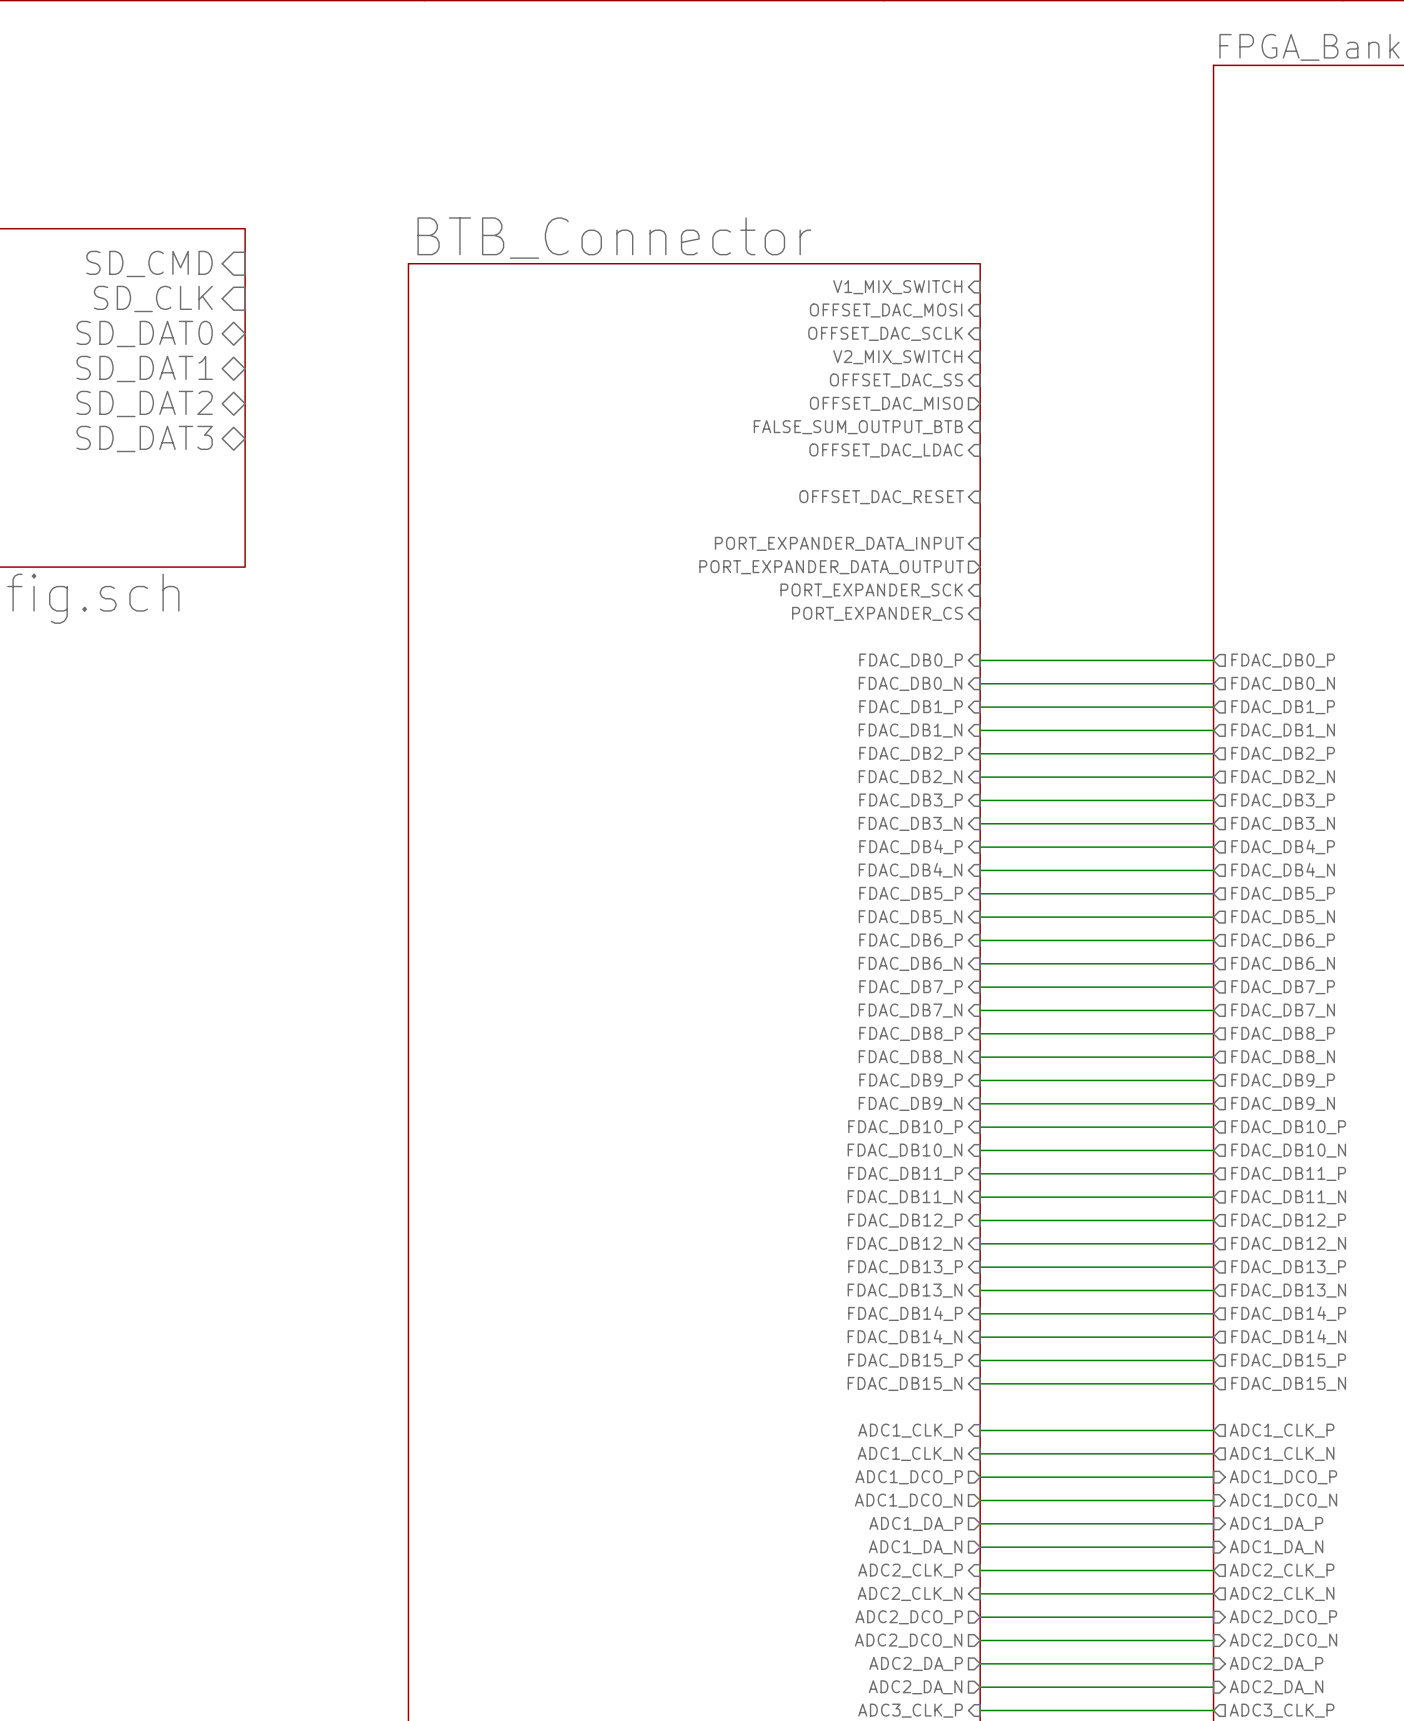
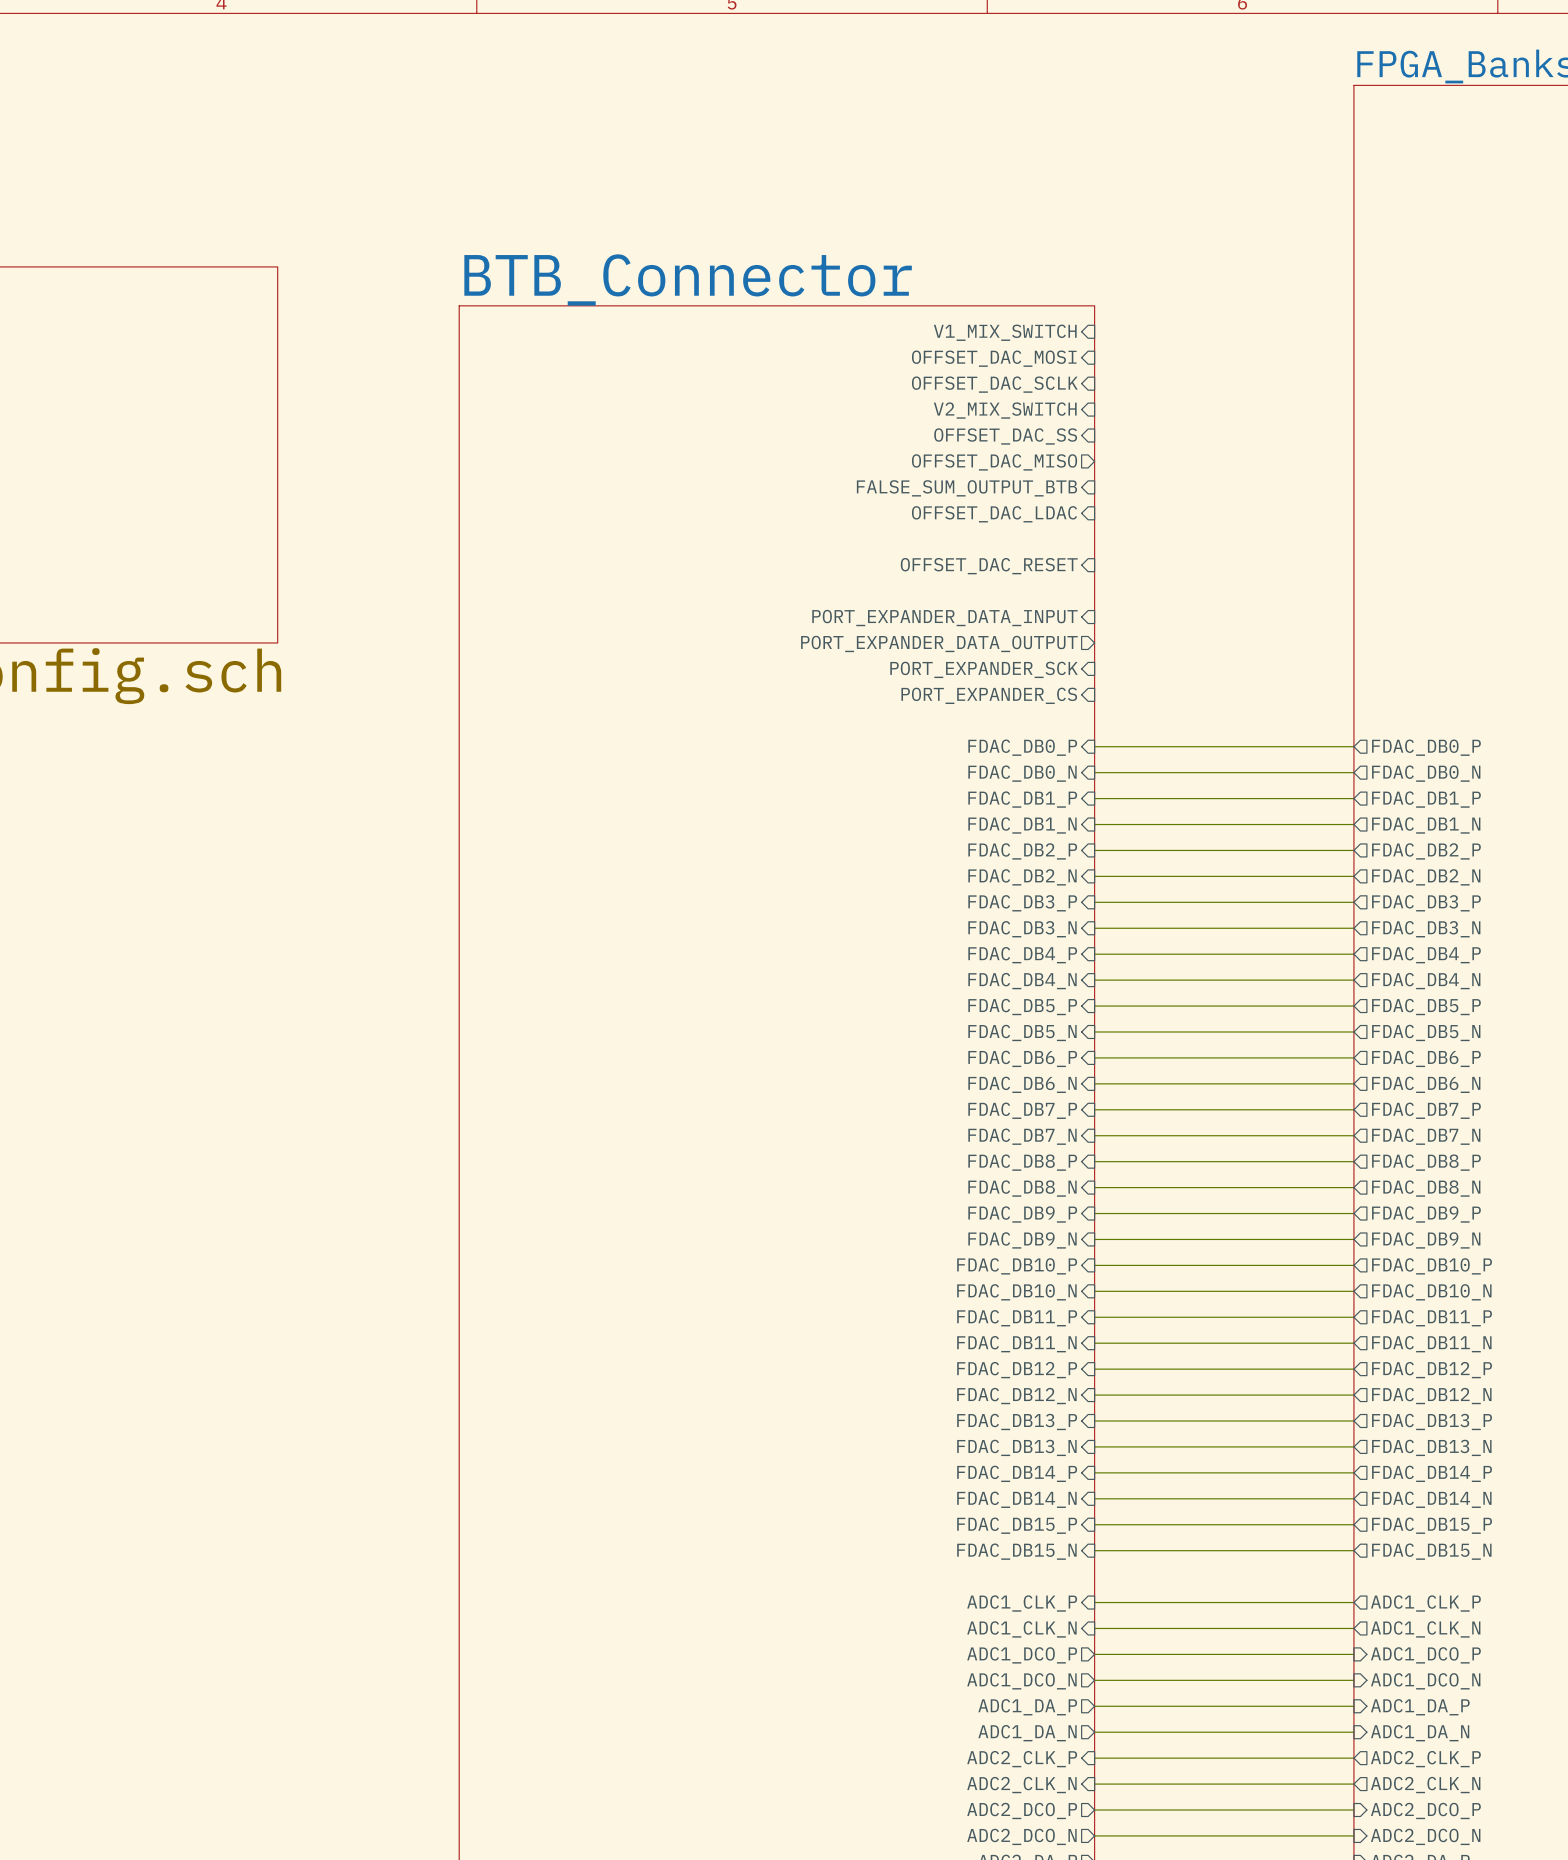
sheet pin: SD_CMD (149, 263) -> none
sheet pin: SD_CLK (153, 298) -> none
sheet pin: SD_DAT0 (144, 333) -> none
sheet pin: SD_DAT1 (144, 368) -> none
sheet pin: SD_DAT2 (144, 403) -> none
sheet pin: SD_DAT3 (144, 438) -> none

